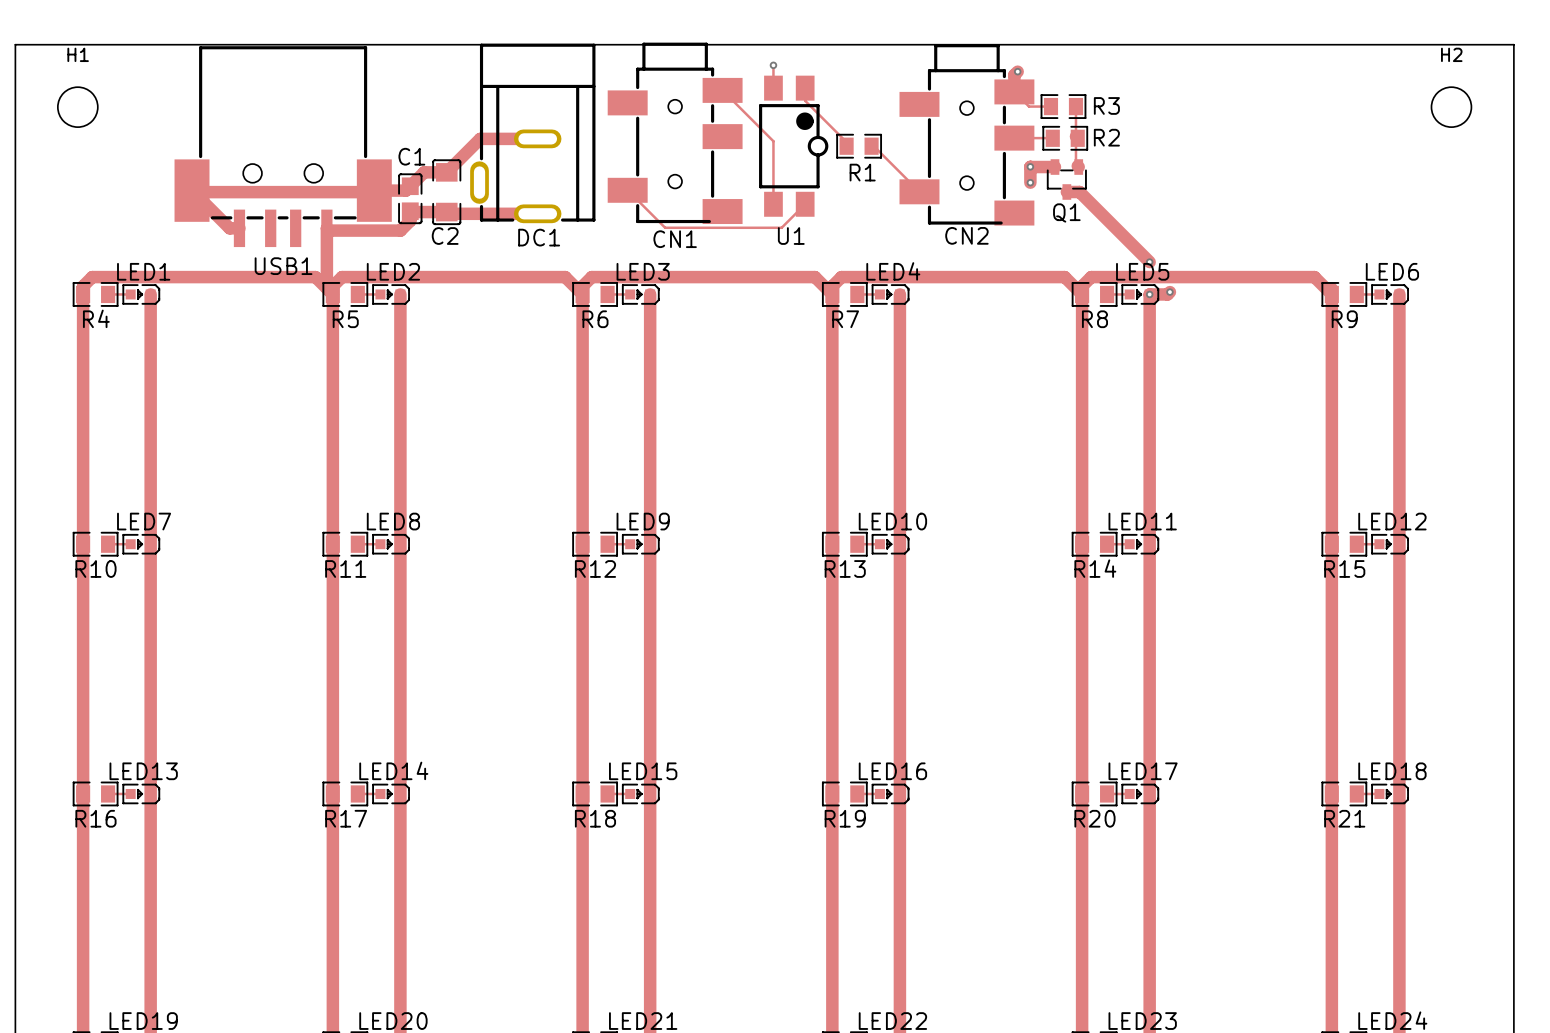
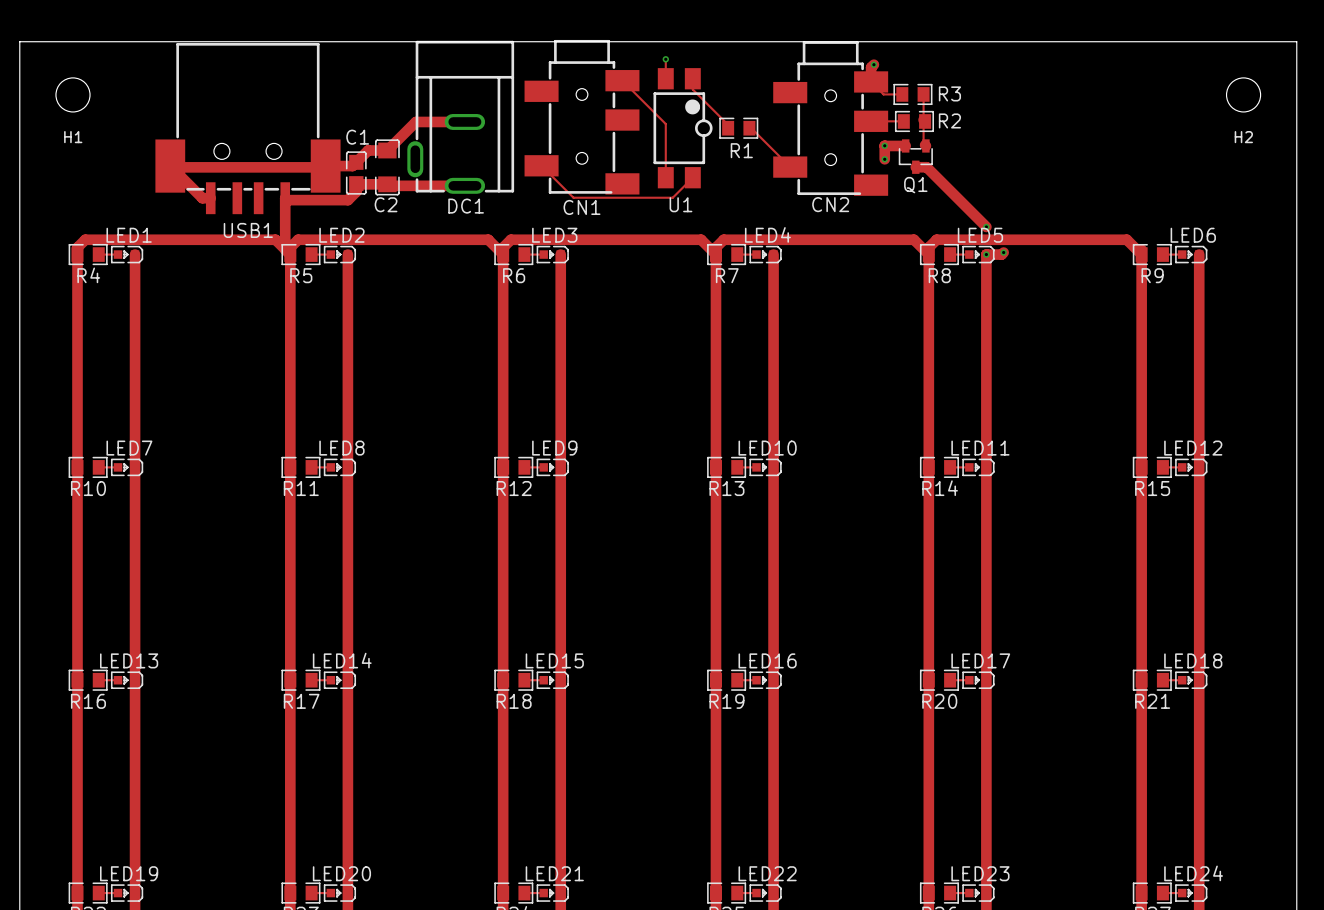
H1 name position: H1 (78, 54) -> H1 (73, 137)
H2 name position: H2 (1451, 54) -> H2 (1243, 137)

